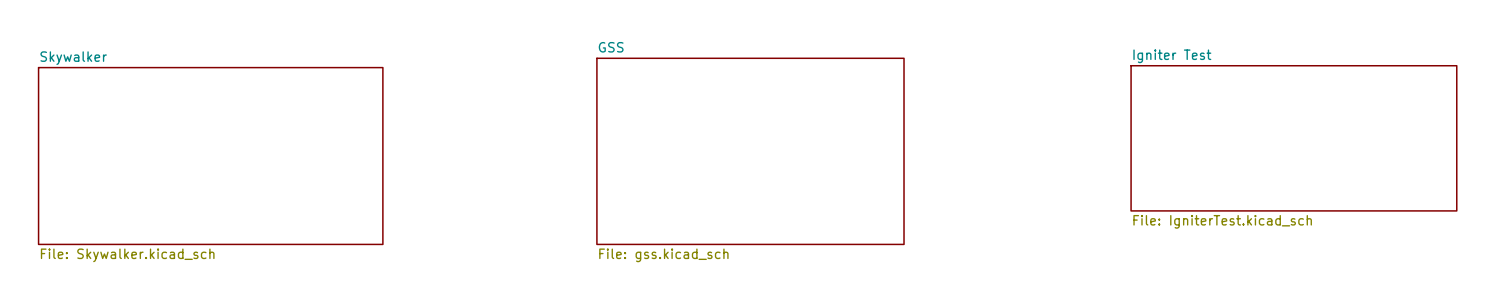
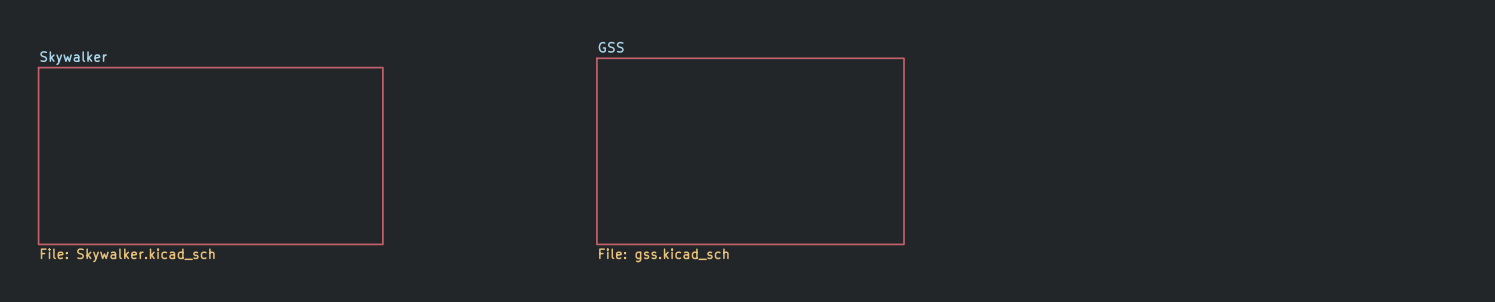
sheet Igniter Test: File: IgniterTest.kicad_sch (1293, 138) -> none

